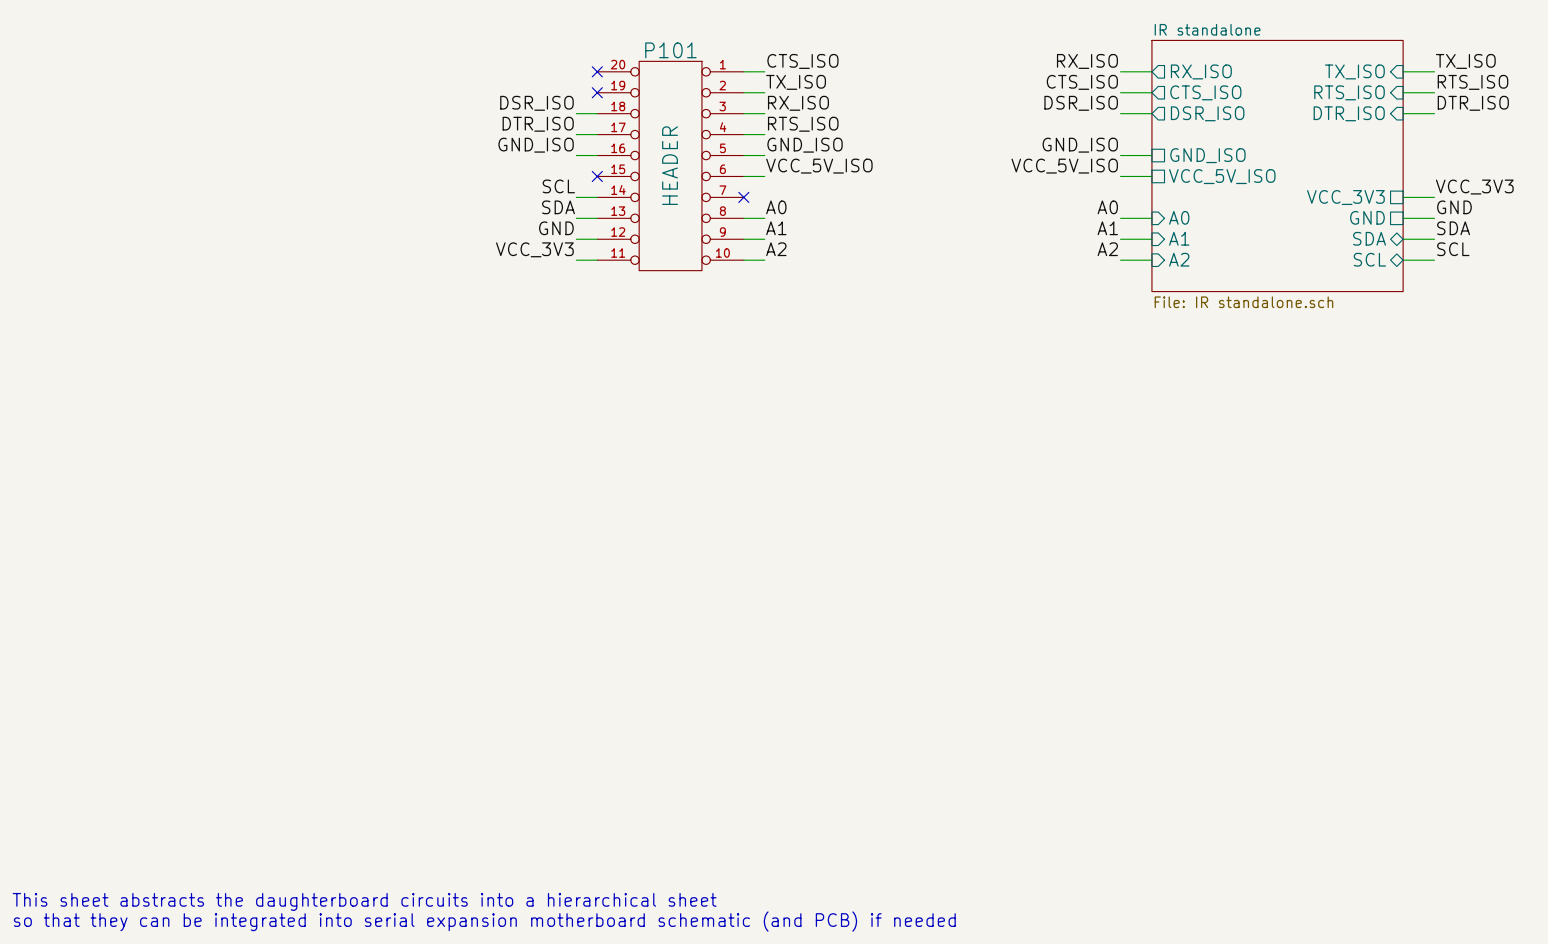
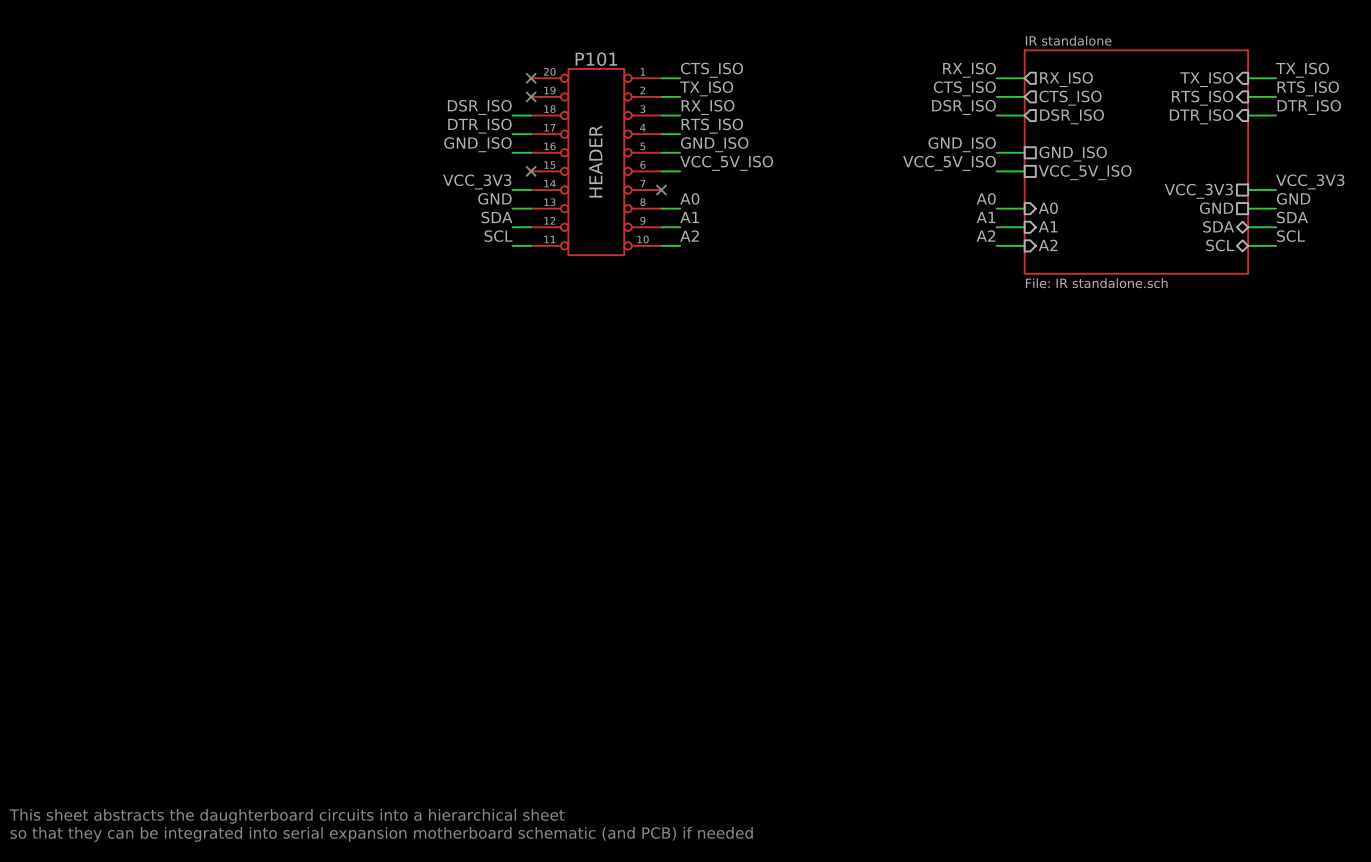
label: SCL (558, 186) -> VCC_3V3 (477, 181)
label: SDA (558, 207) -> GND (494, 198)
label: GND (556, 228) -> SDA (496, 217)
label: VCC_3V3 (534, 249) -> SCL (498, 236)

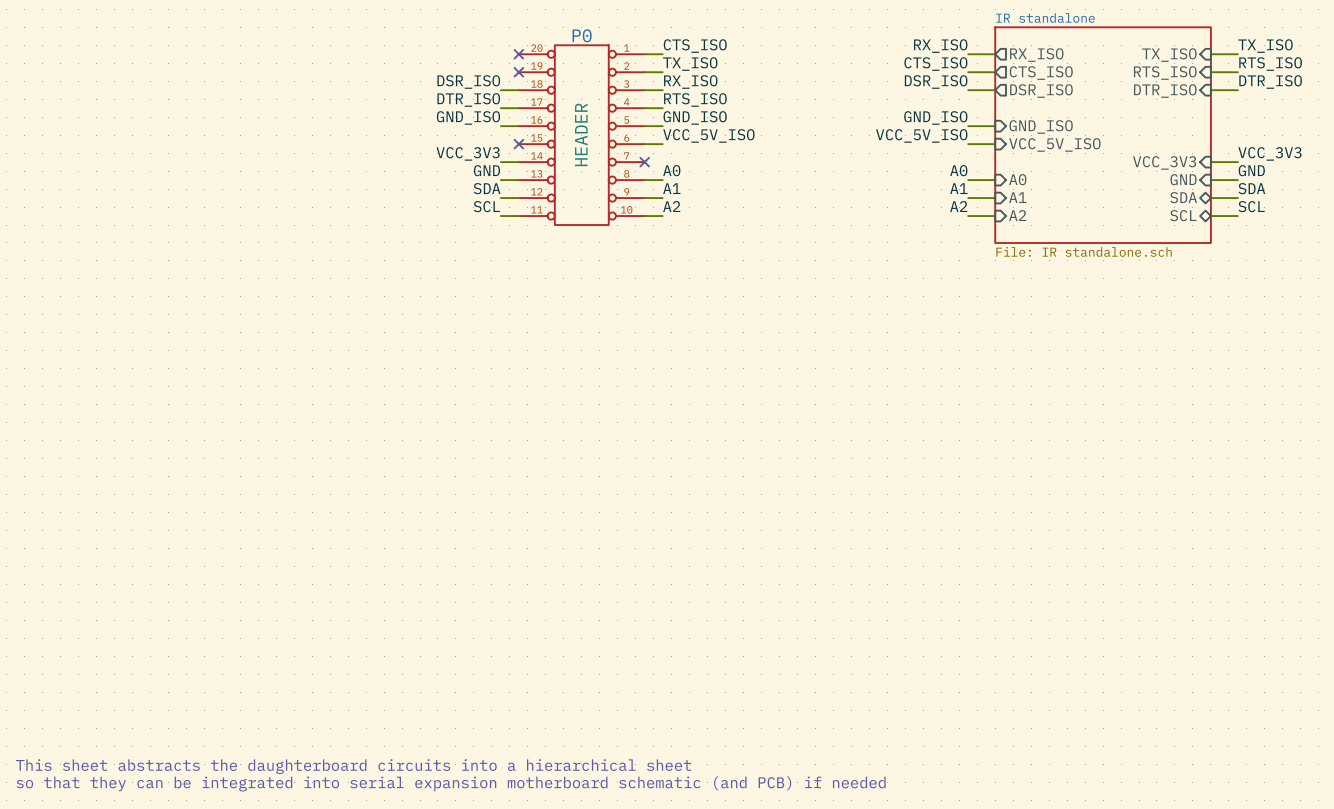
P101 name: P101 (596, 59) -> P0 (582, 35)
sheet pin shape: passive (1073, 154) -> input (1041, 126)
sheet pin shape: passive (1085, 172) -> input (1054, 144)
sheet pin shape: passive (1198, 191) -> input (1164, 162)
sheet pin shape: passive (1216, 208) -> input (1183, 179)

